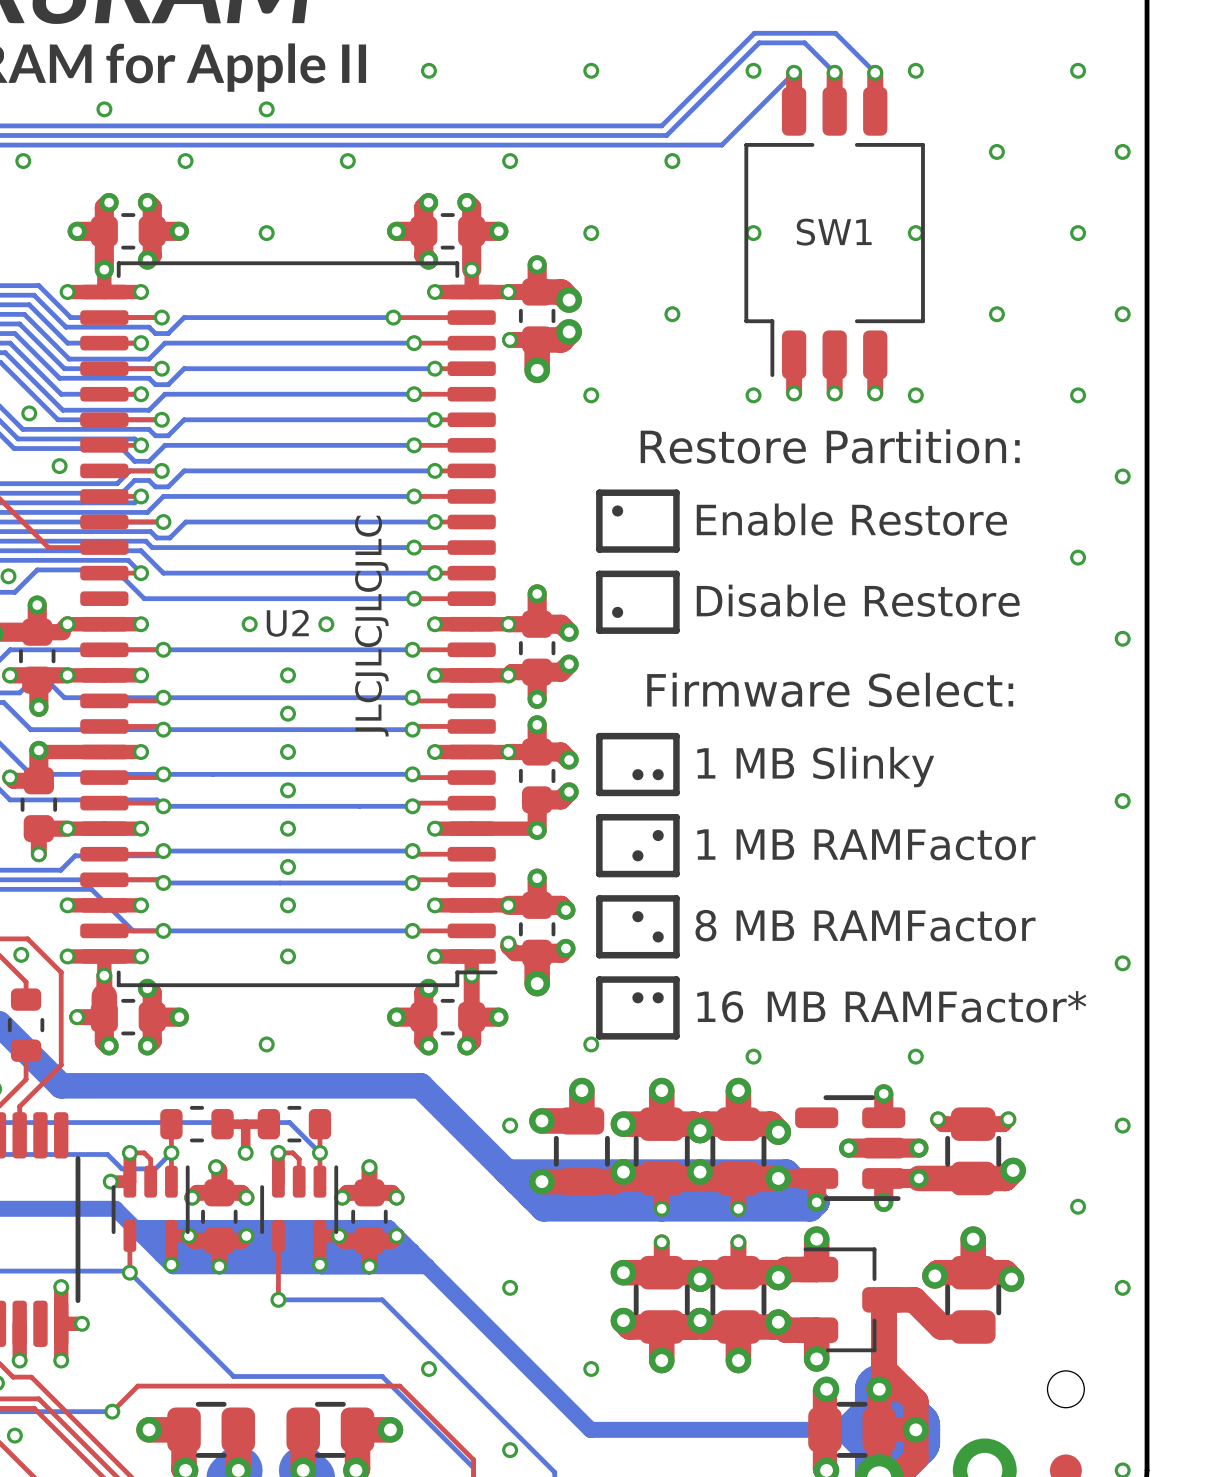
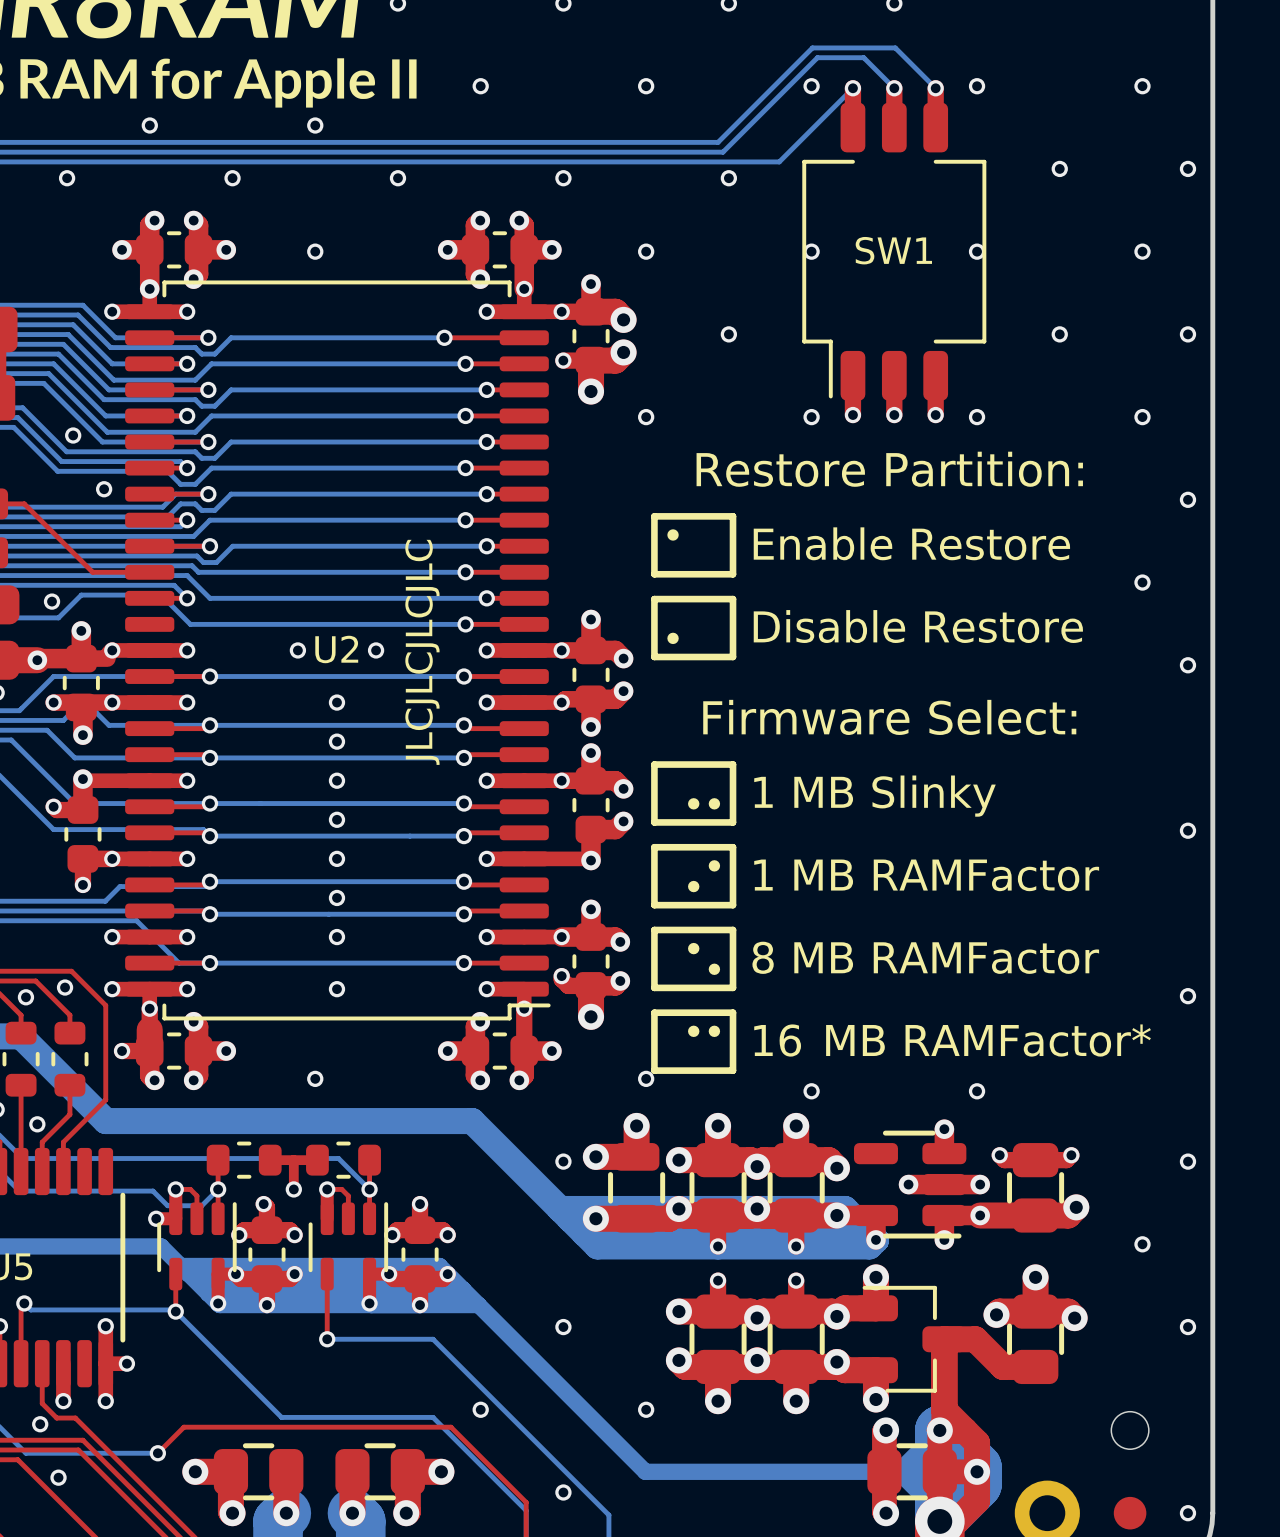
SW1 footprint: [744, 87, 925, 380] -> [802, 102, 987, 401]

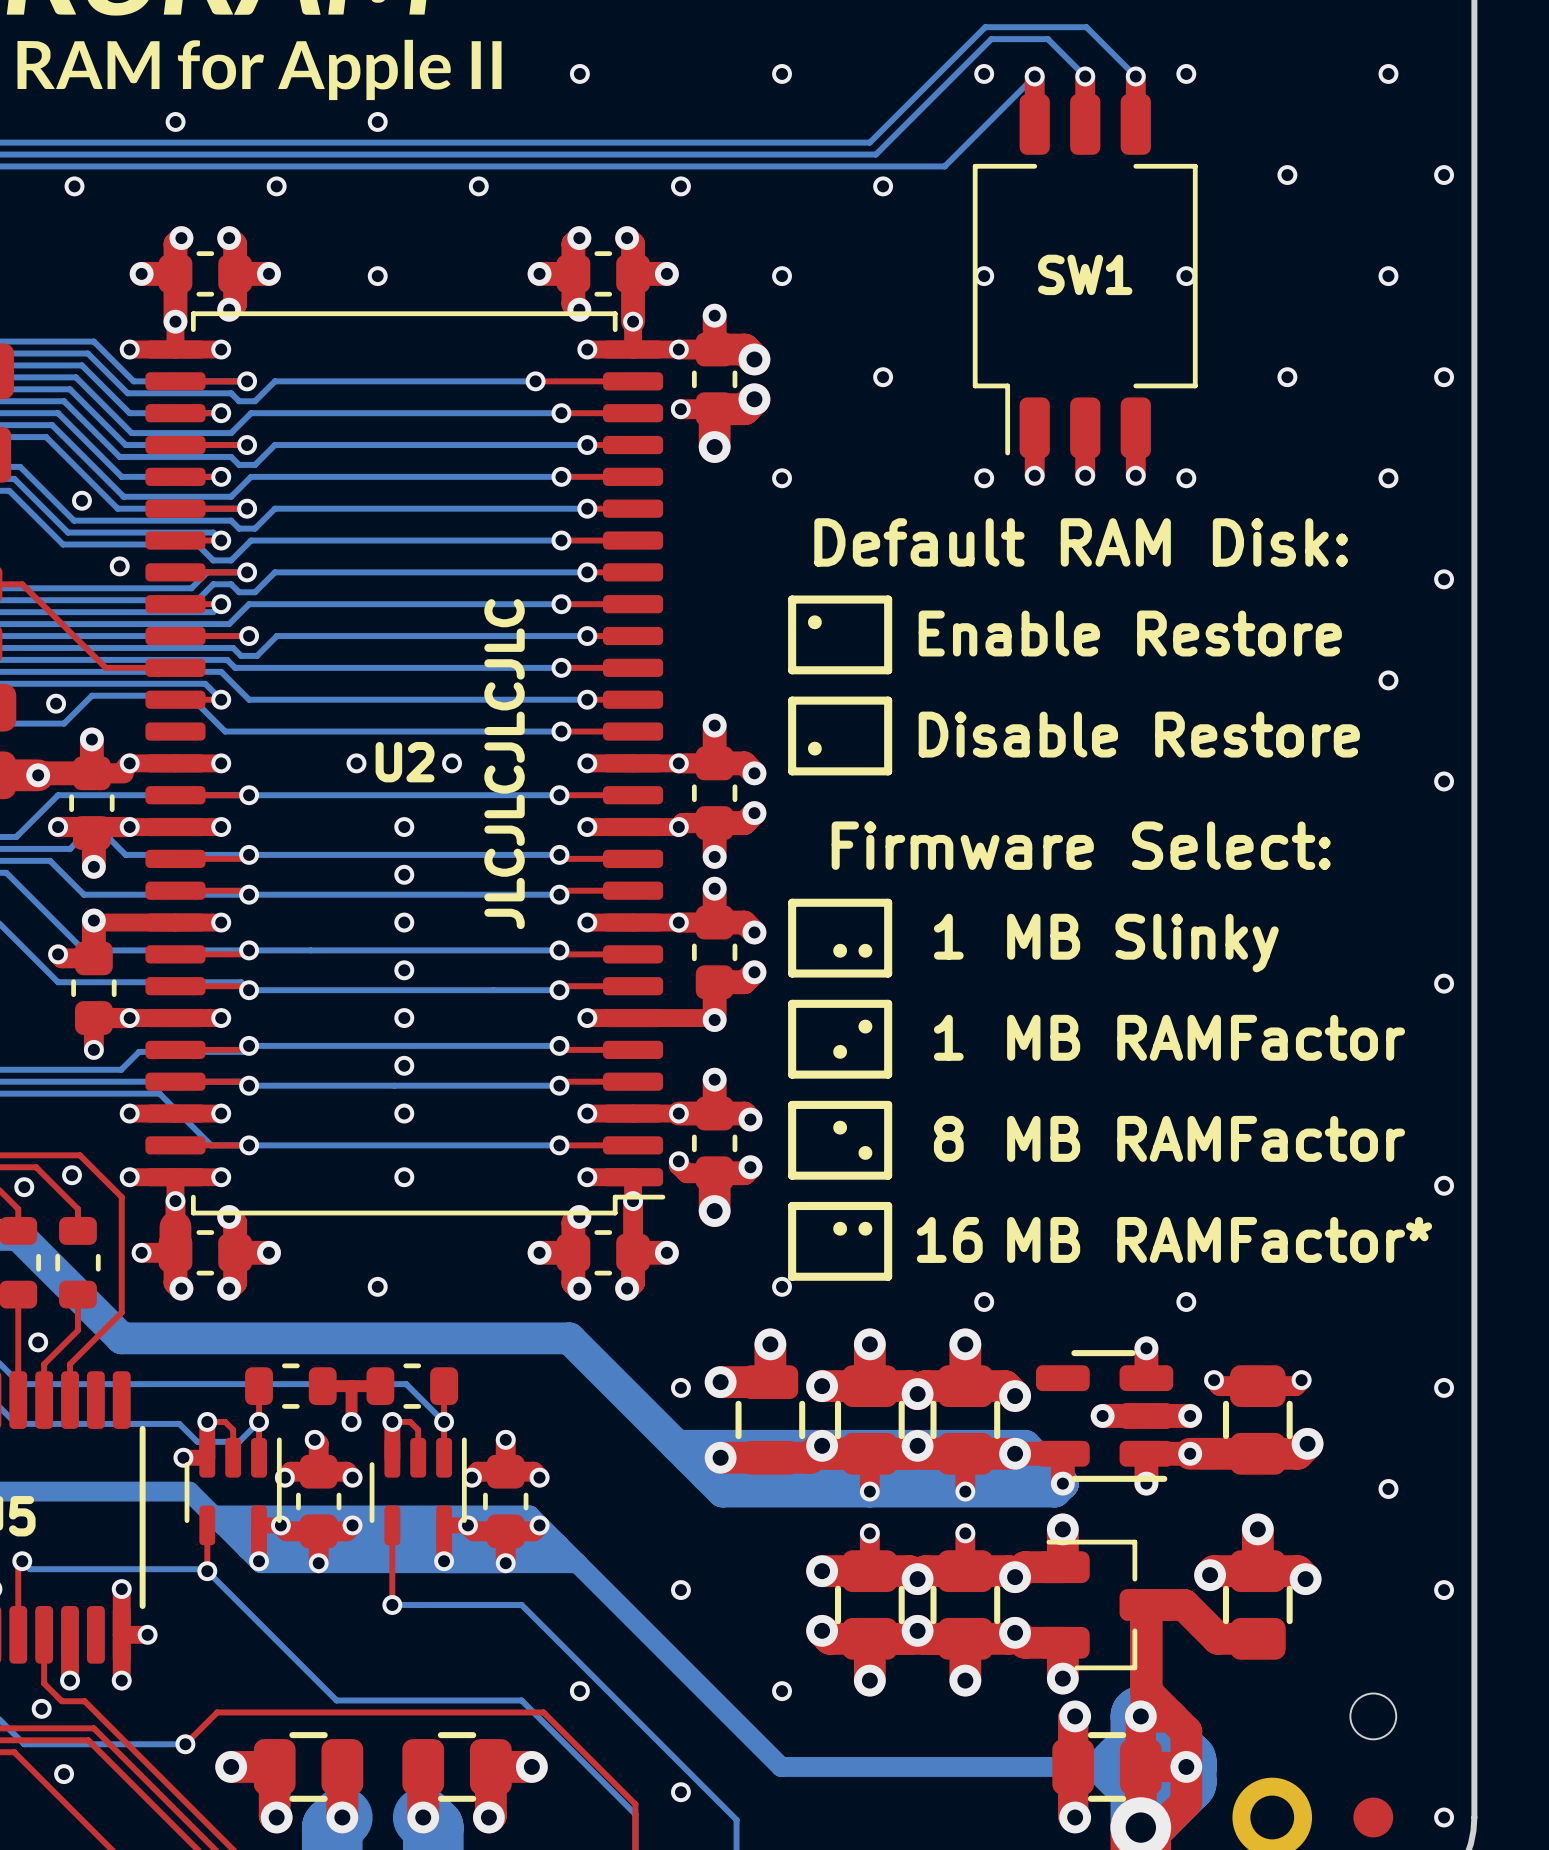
text: Restore Partition: (889, 469) -> Default RAM Disk: (1081, 542)
text: none -> 1 (948, 936)
text: 1 MB Slinky (874, 796) -> MB Slinky (1142, 943)
text: none -> 1 (948, 1037)
text: 1 MB RAMFactor (926, 875) -> MB RAMFactor (1206, 1037)
text: none -> 8 (948, 1138)
text: 8 MB RAMFactor (925, 957) -> MB RAMFactor (1206, 1138)

